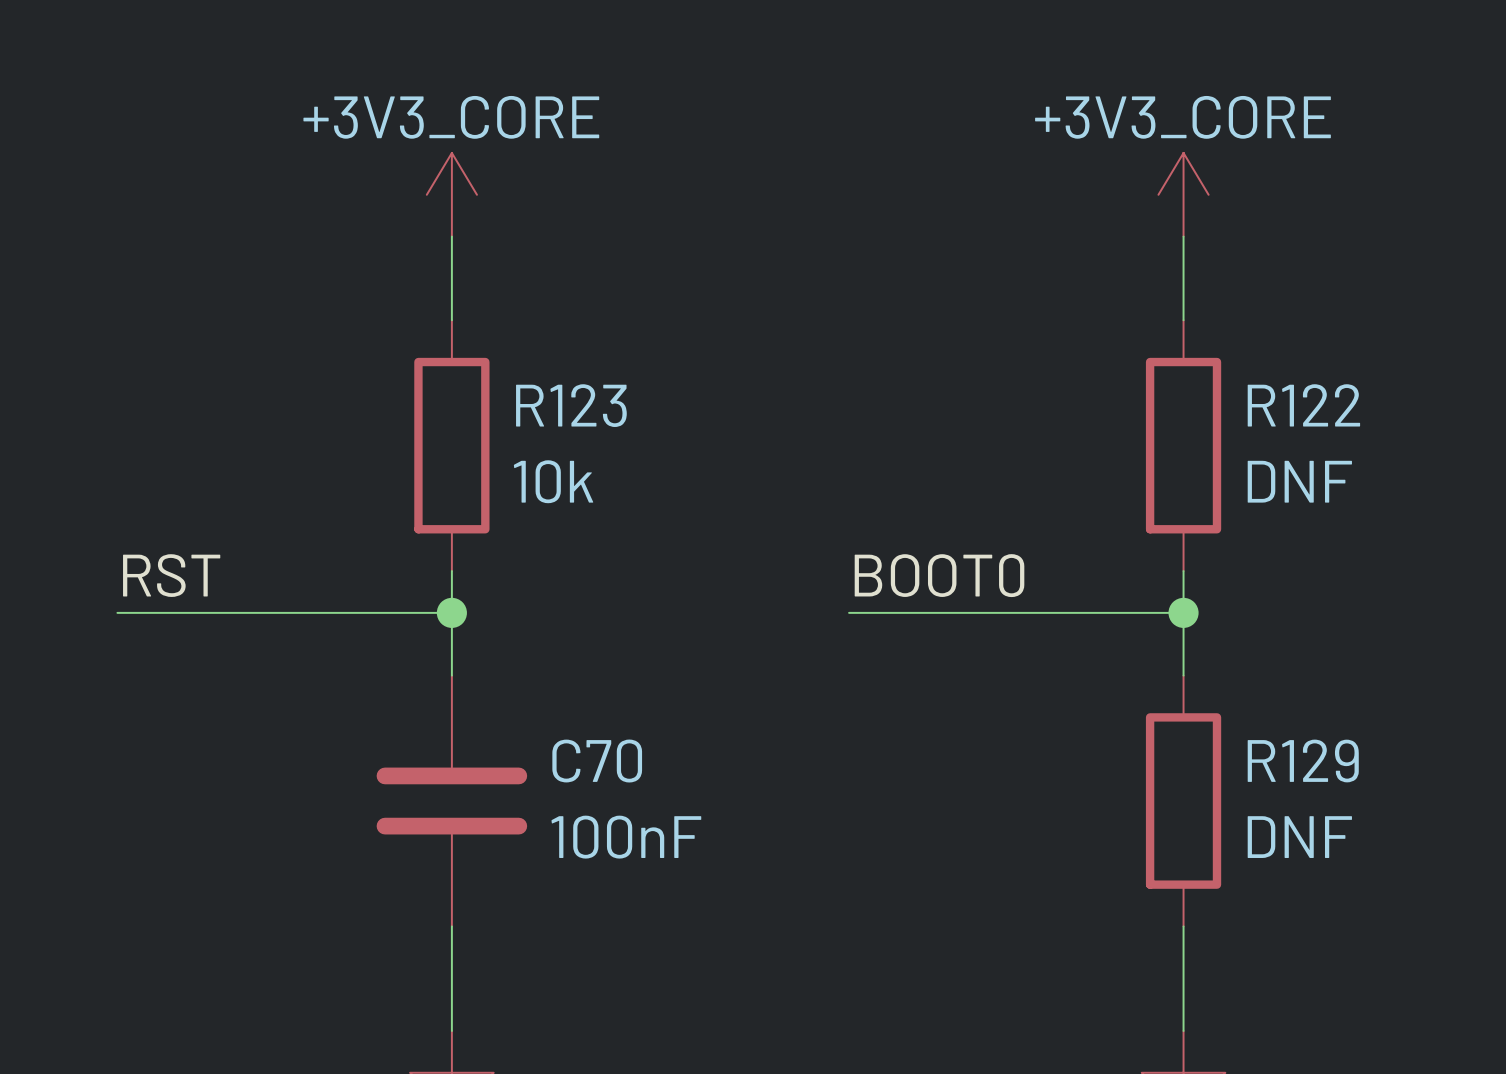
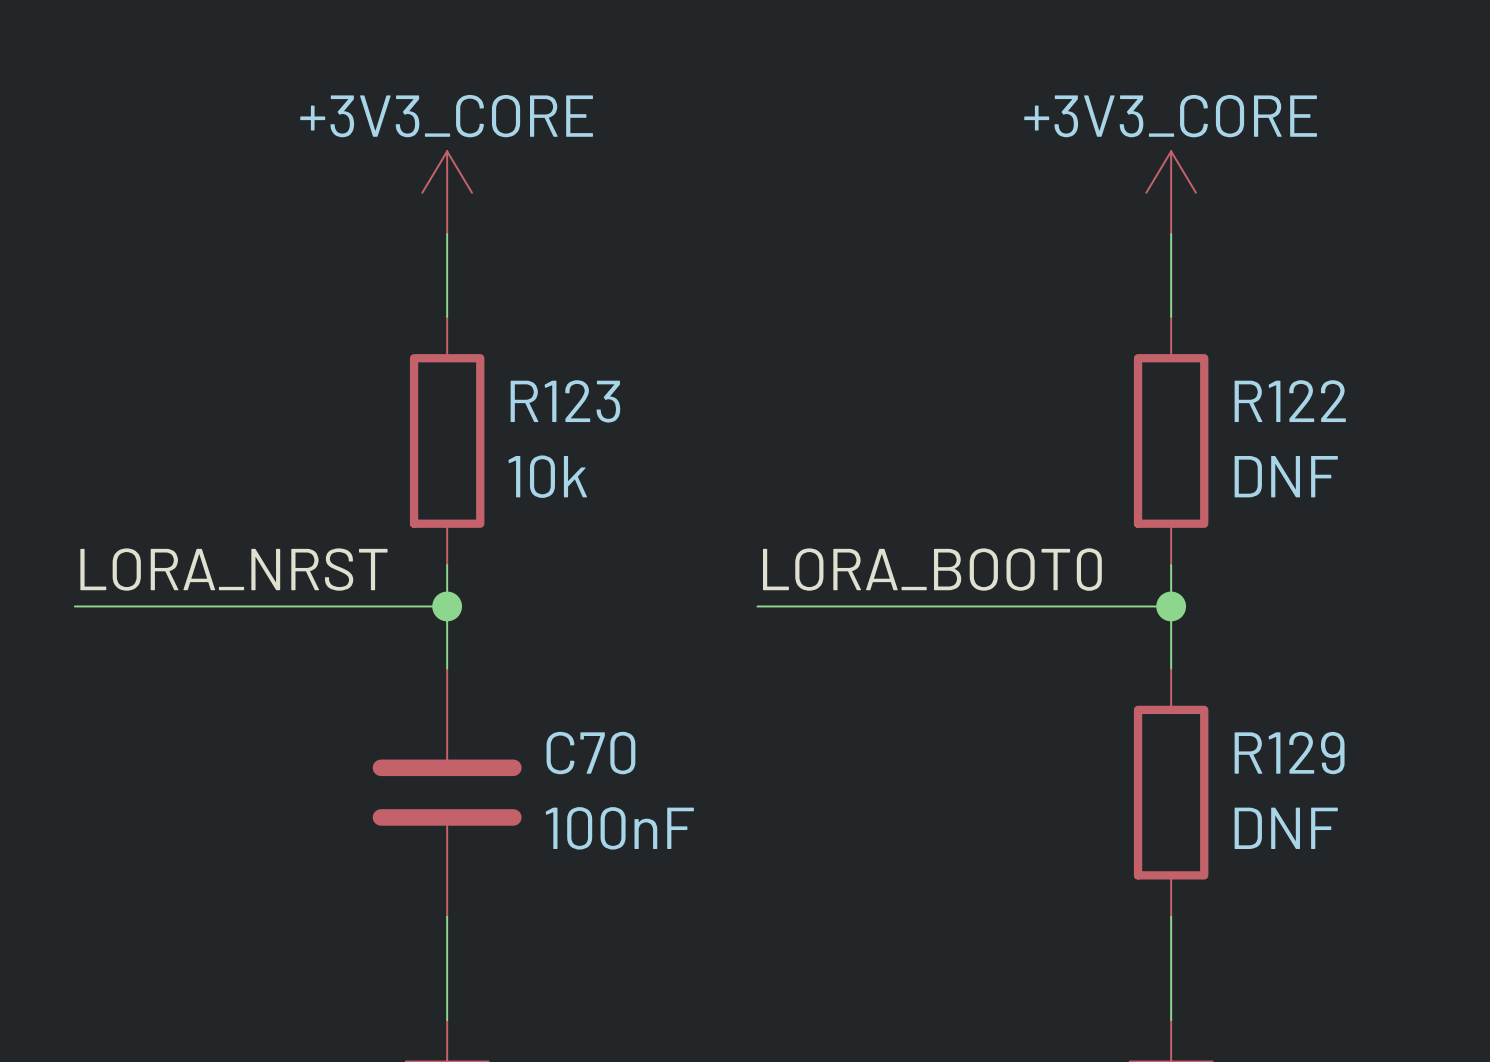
label: RST (171, 575) -> none
label: none -> LORA_NRST (233, 569)
label: BOOT0 (939, 575) -> LORA_BOOT0 (932, 569)
wire: none -> (74, 606) (116, 606)
wire: none -> (757, 606) (840, 606)

